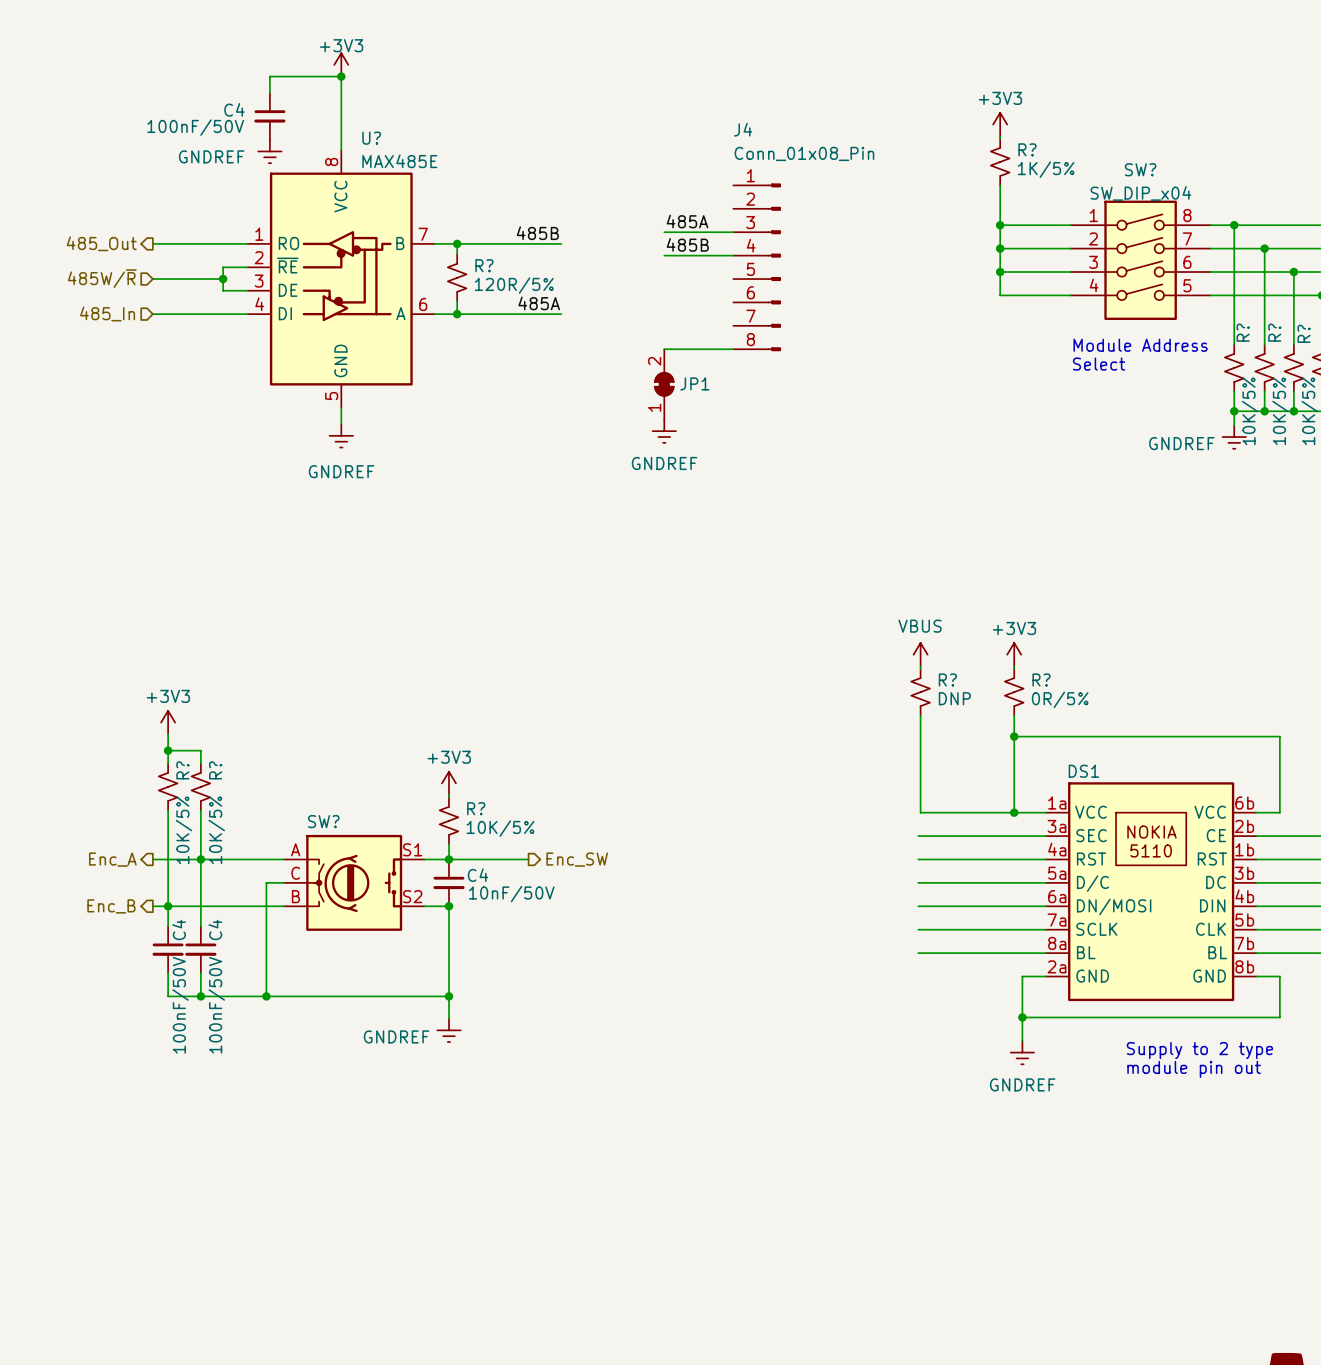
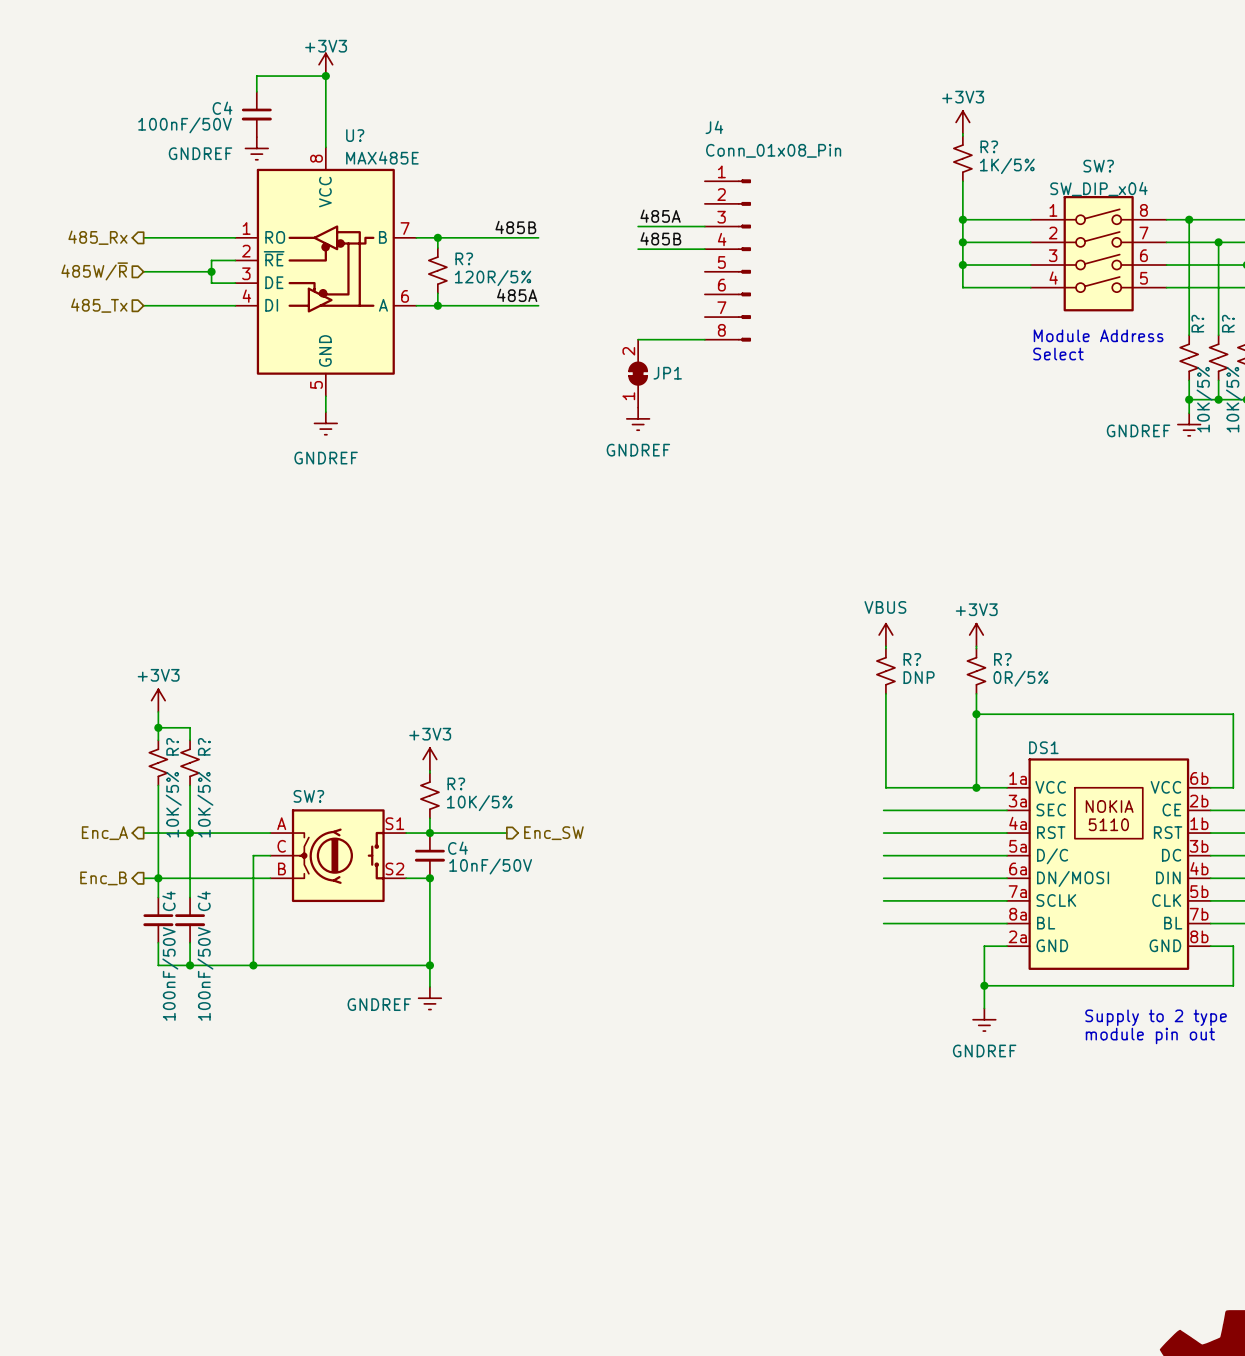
hierarchical label: 485_Out (101, 243) -> 485_Rx (97, 237)
hierarchical label: 485_In (107, 313) -> 485_Tx (99, 305)

